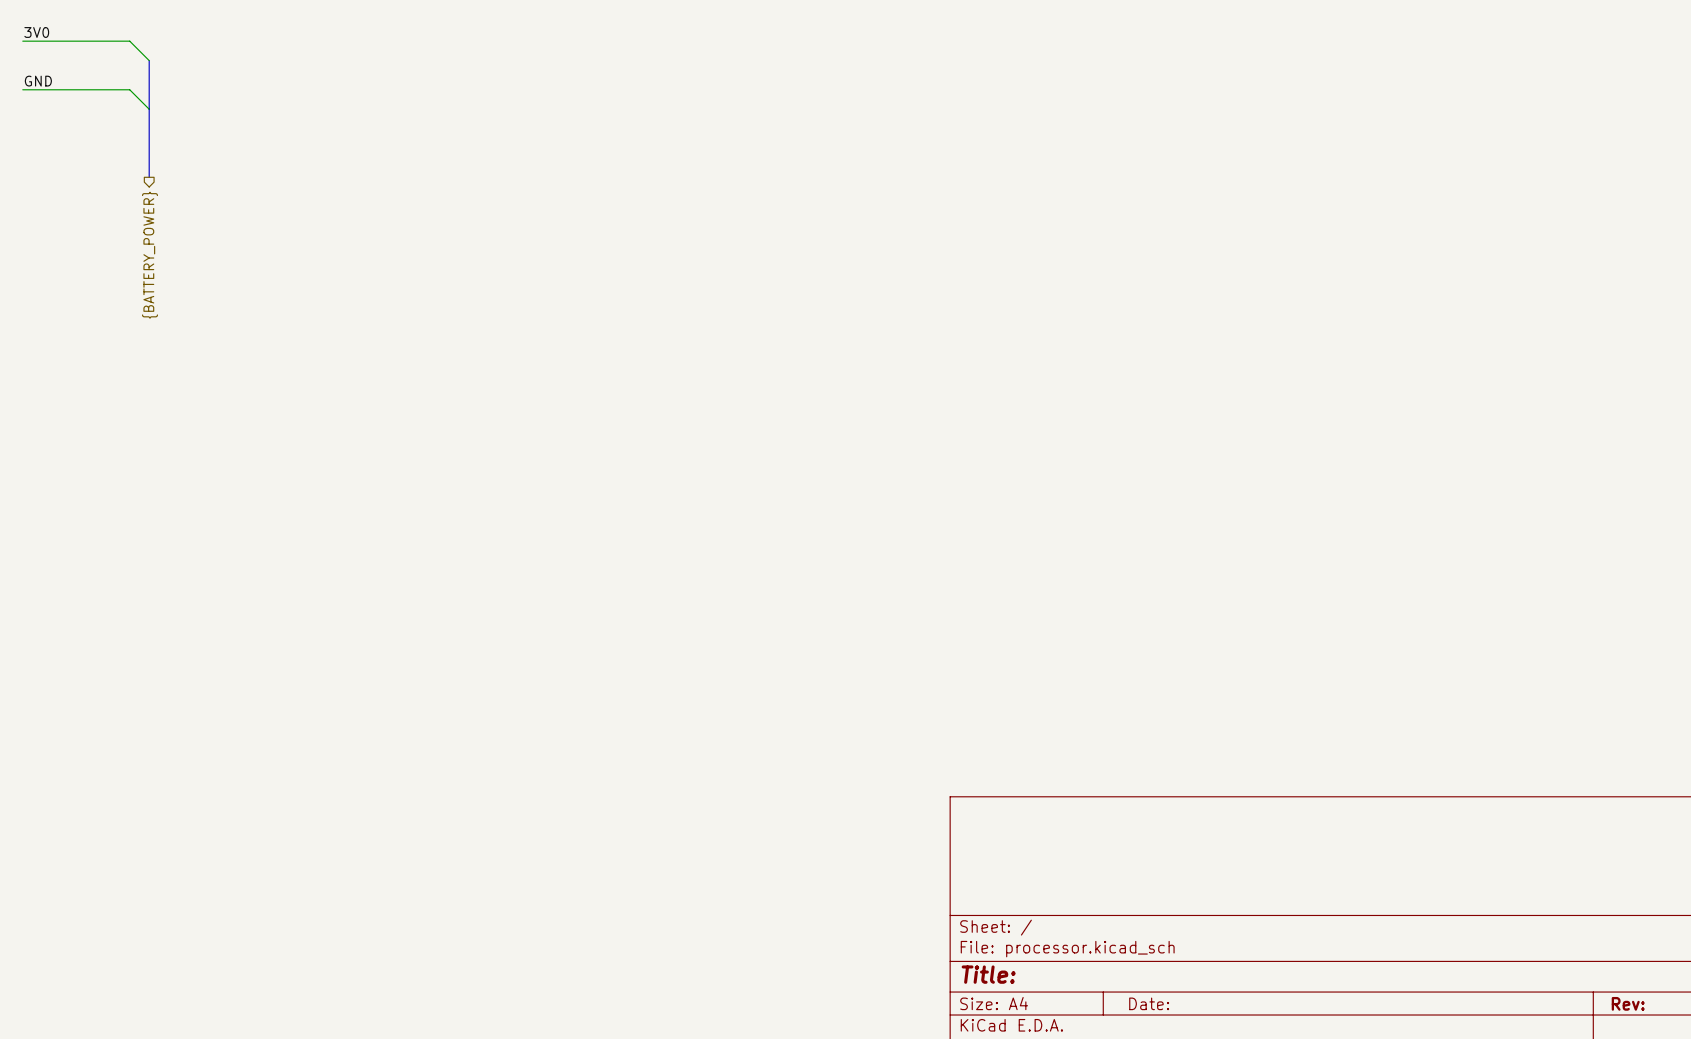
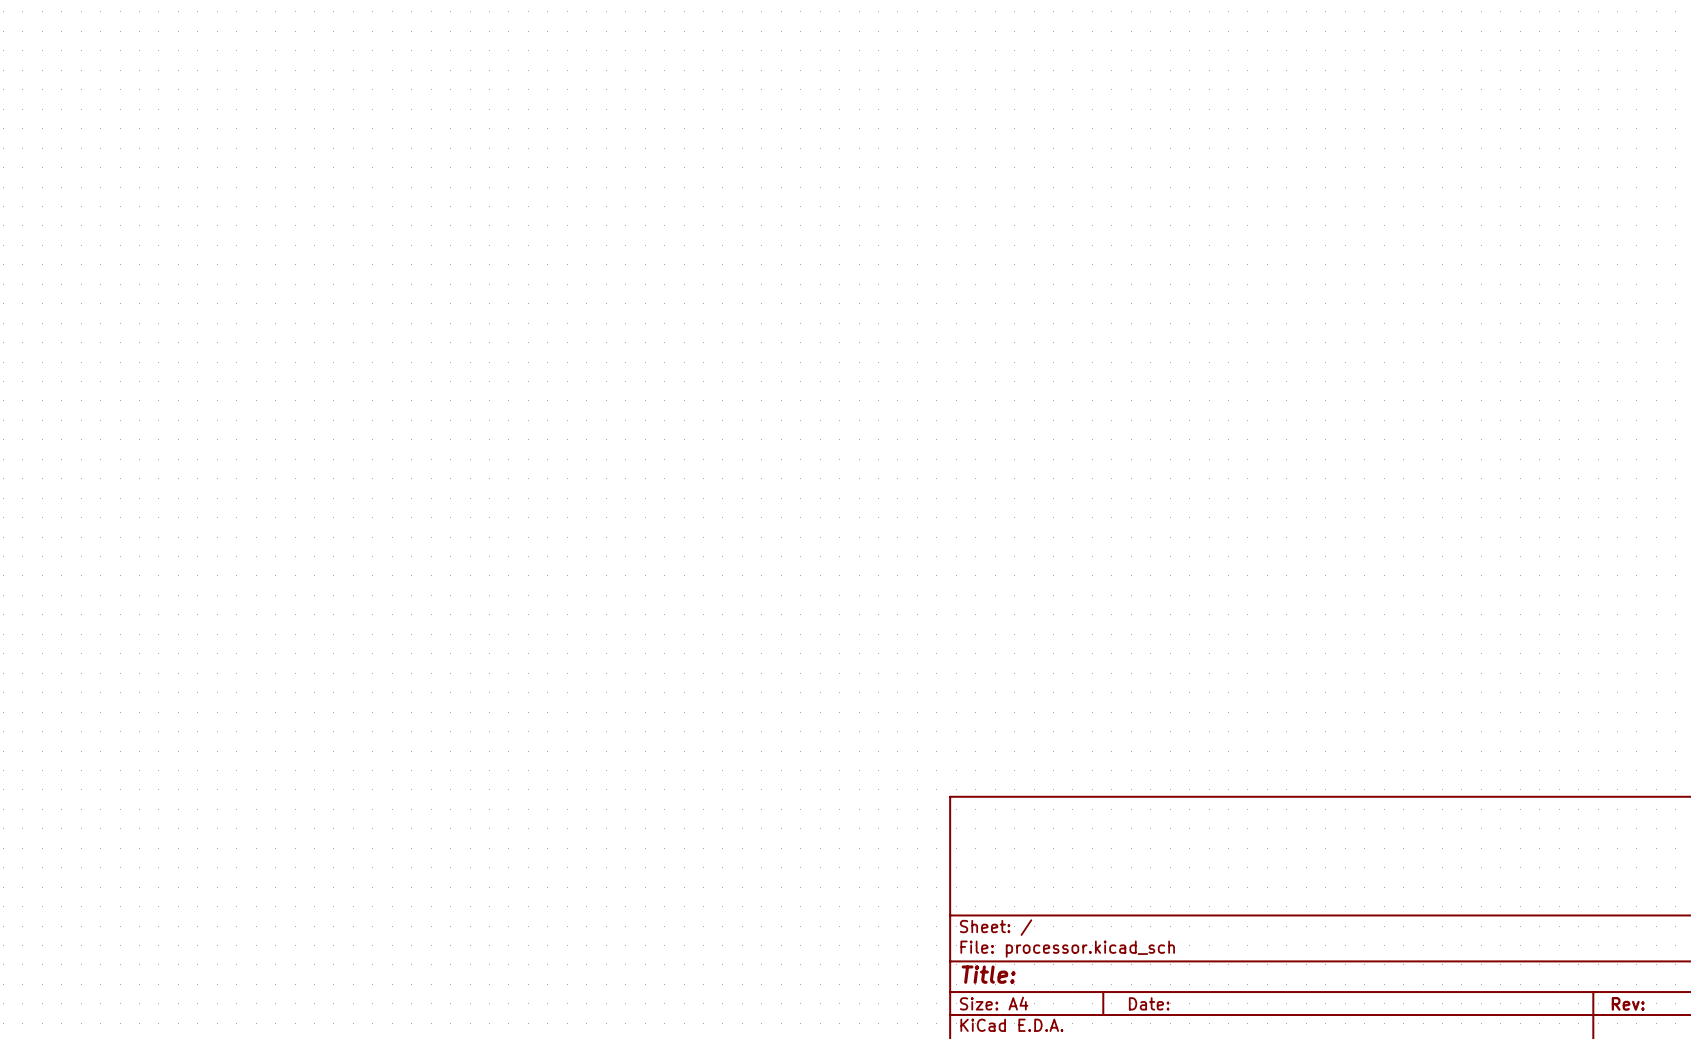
label: 3V0 (36, 32) -> none
wire: (22, 41) (129, 41) (149, 60) -> none
bus: (149, 60) (149, 177) -> none
label: GND (38, 81) -> none
wire: (22, 89) (129, 89) (149, 109) -> none
hierarchical label: {BATTERY_POWER} (149, 255) -> none

